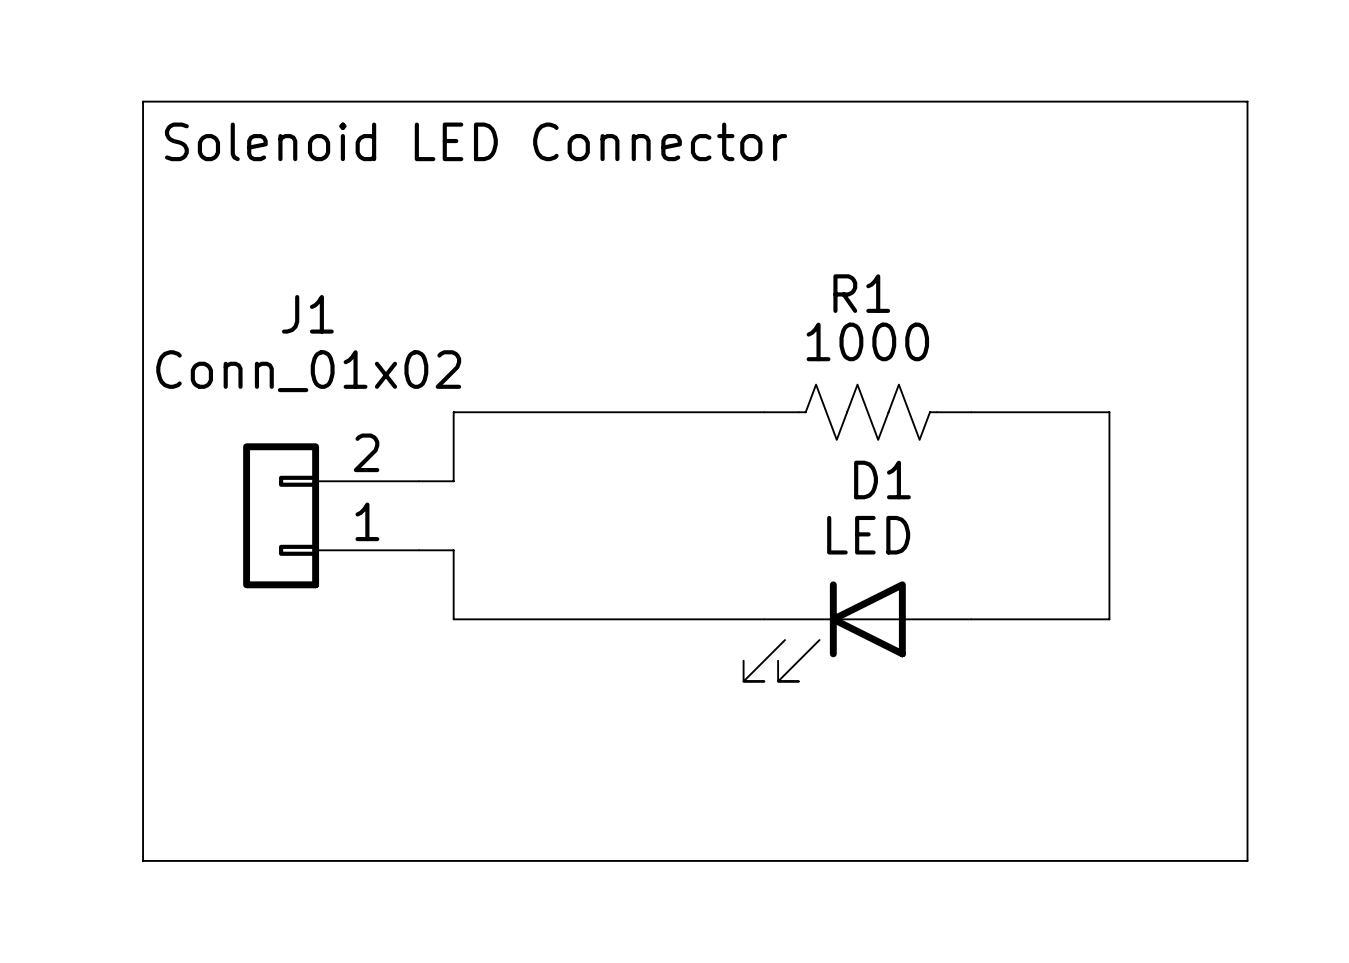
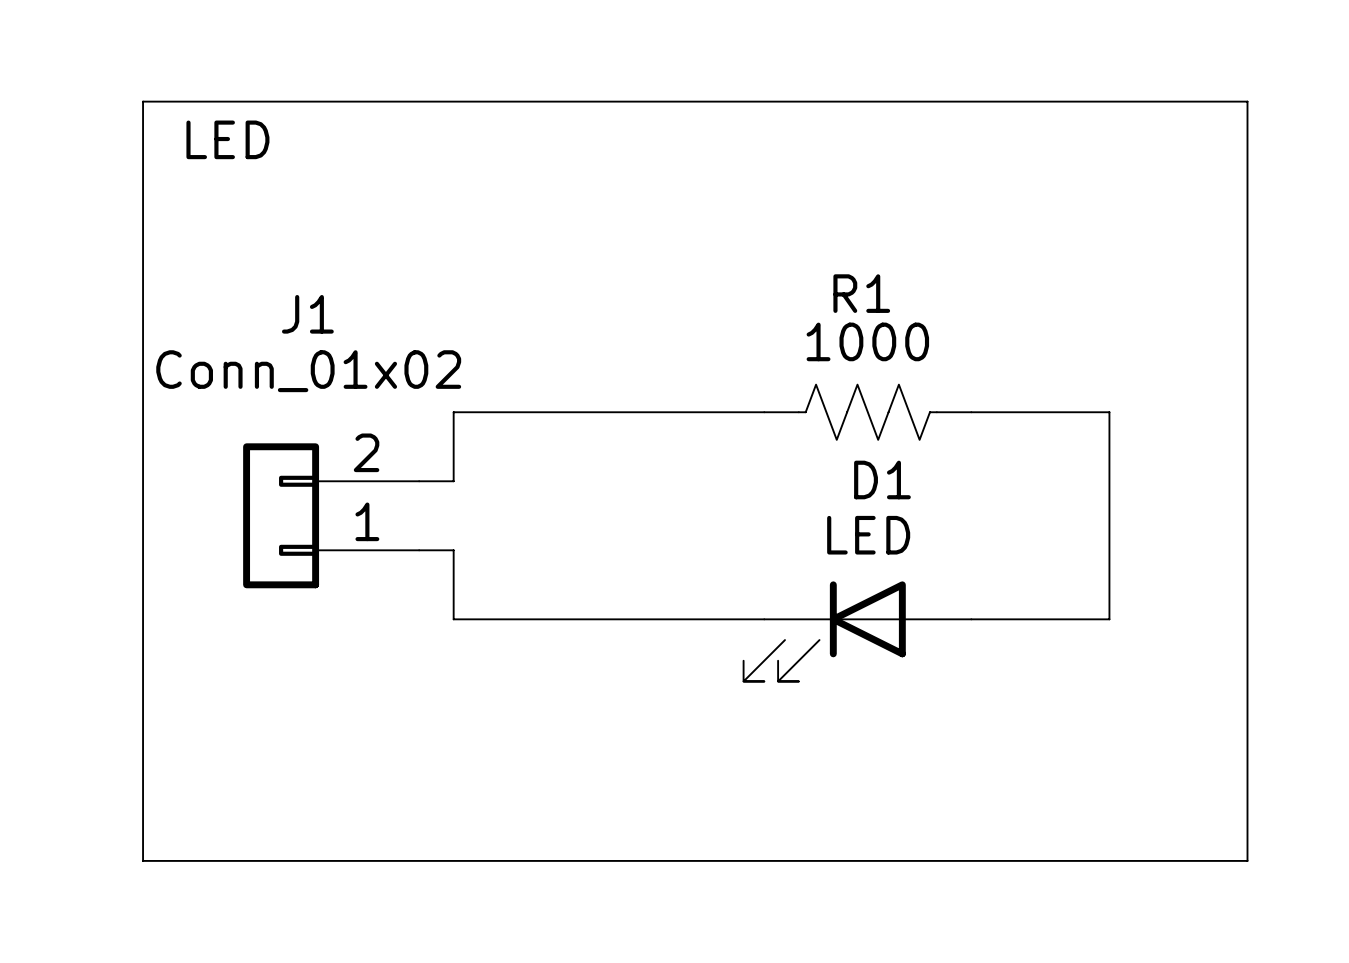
label: none -> LED (227, 139)
text: Solenoid LED Connector (476, 141) -> none

